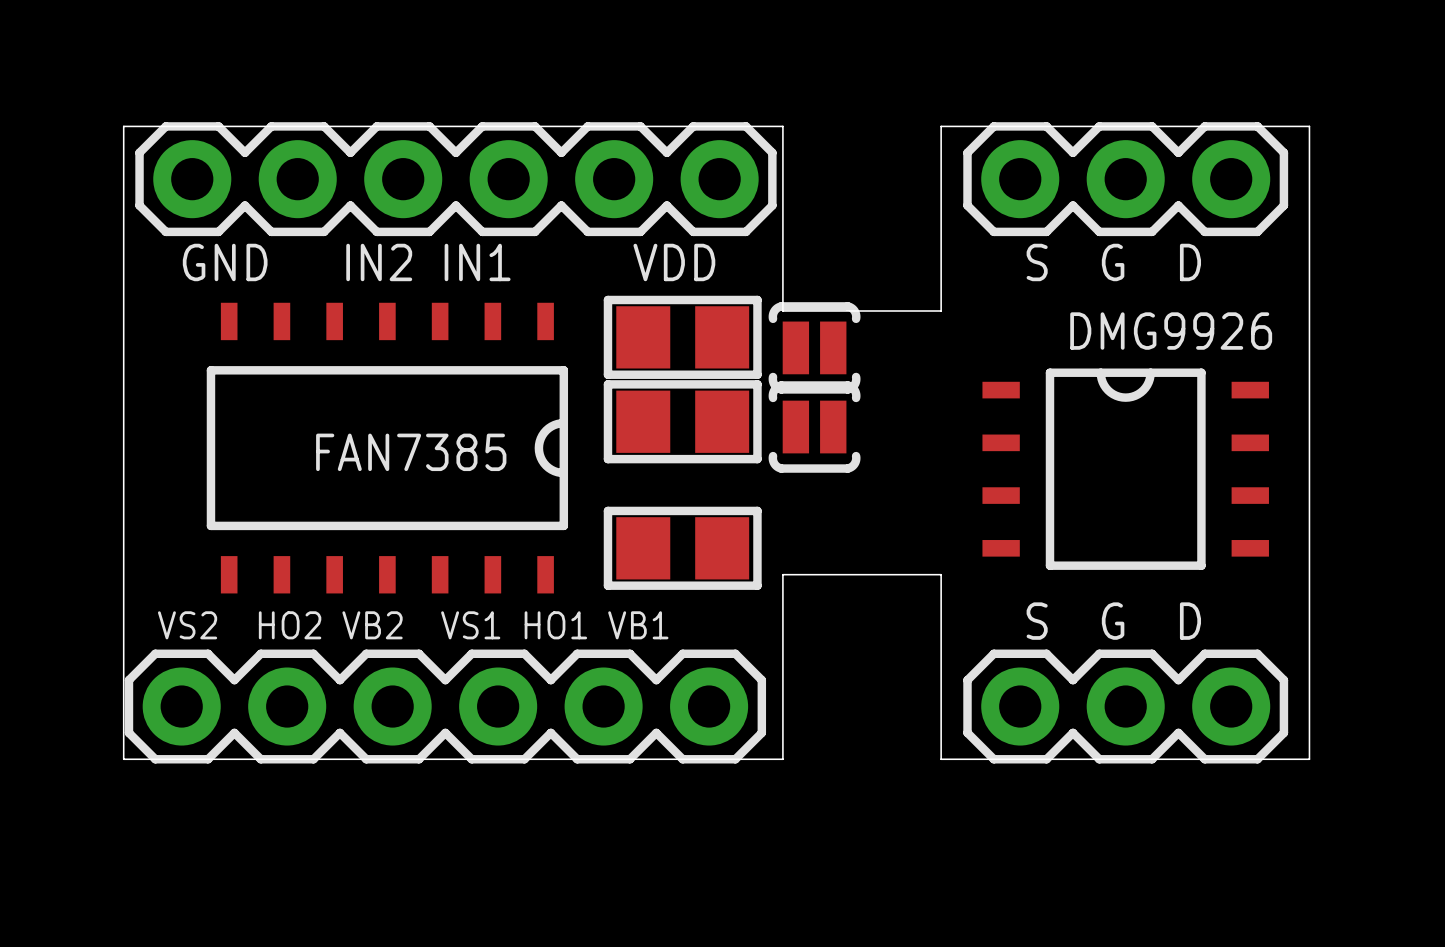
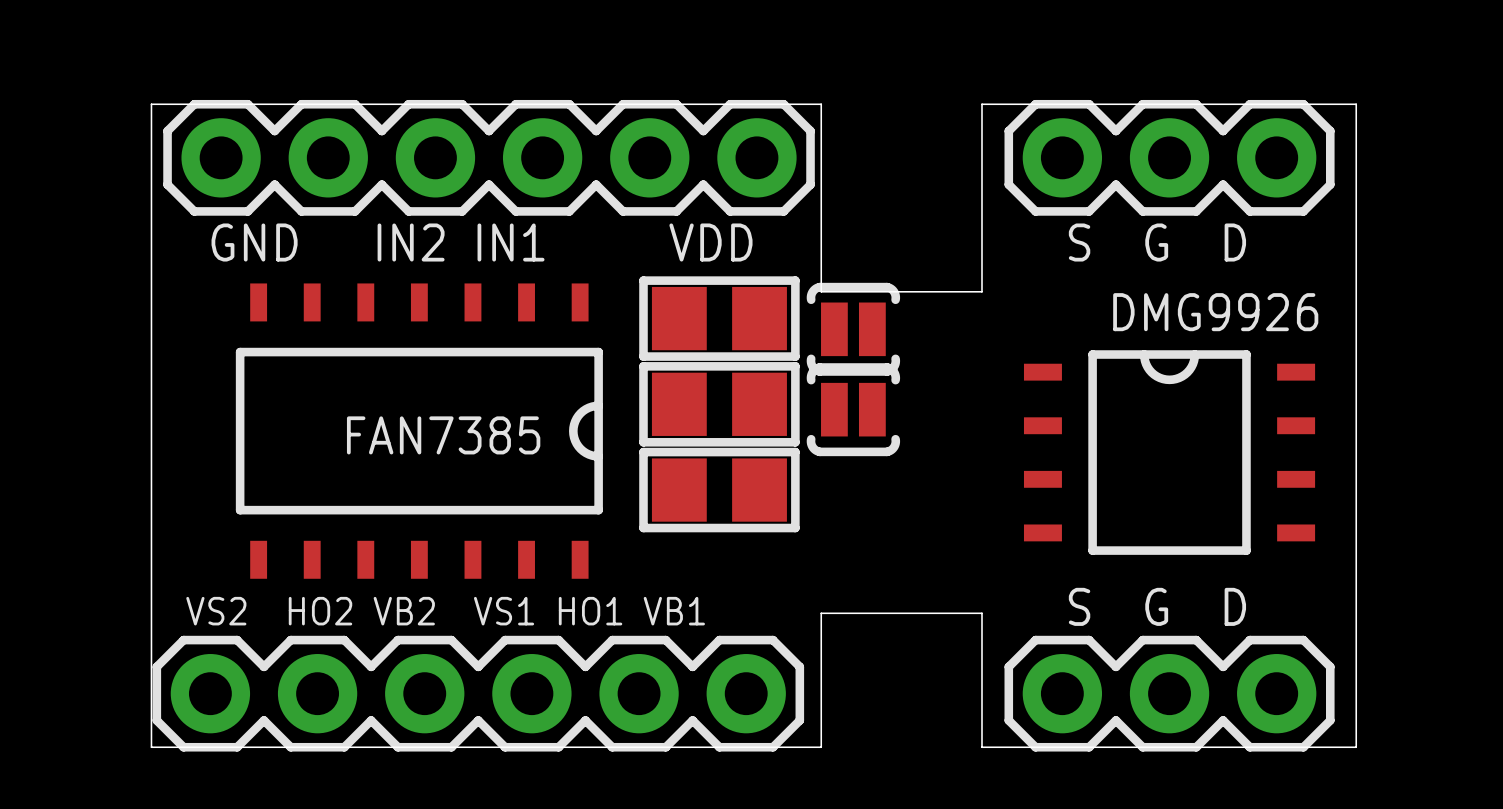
part position: (682, 548) -> (719, 490)
board edge: (782, 627) (782, 574) (941, 574) (941, 627) -> (821, 613) (981, 613)

